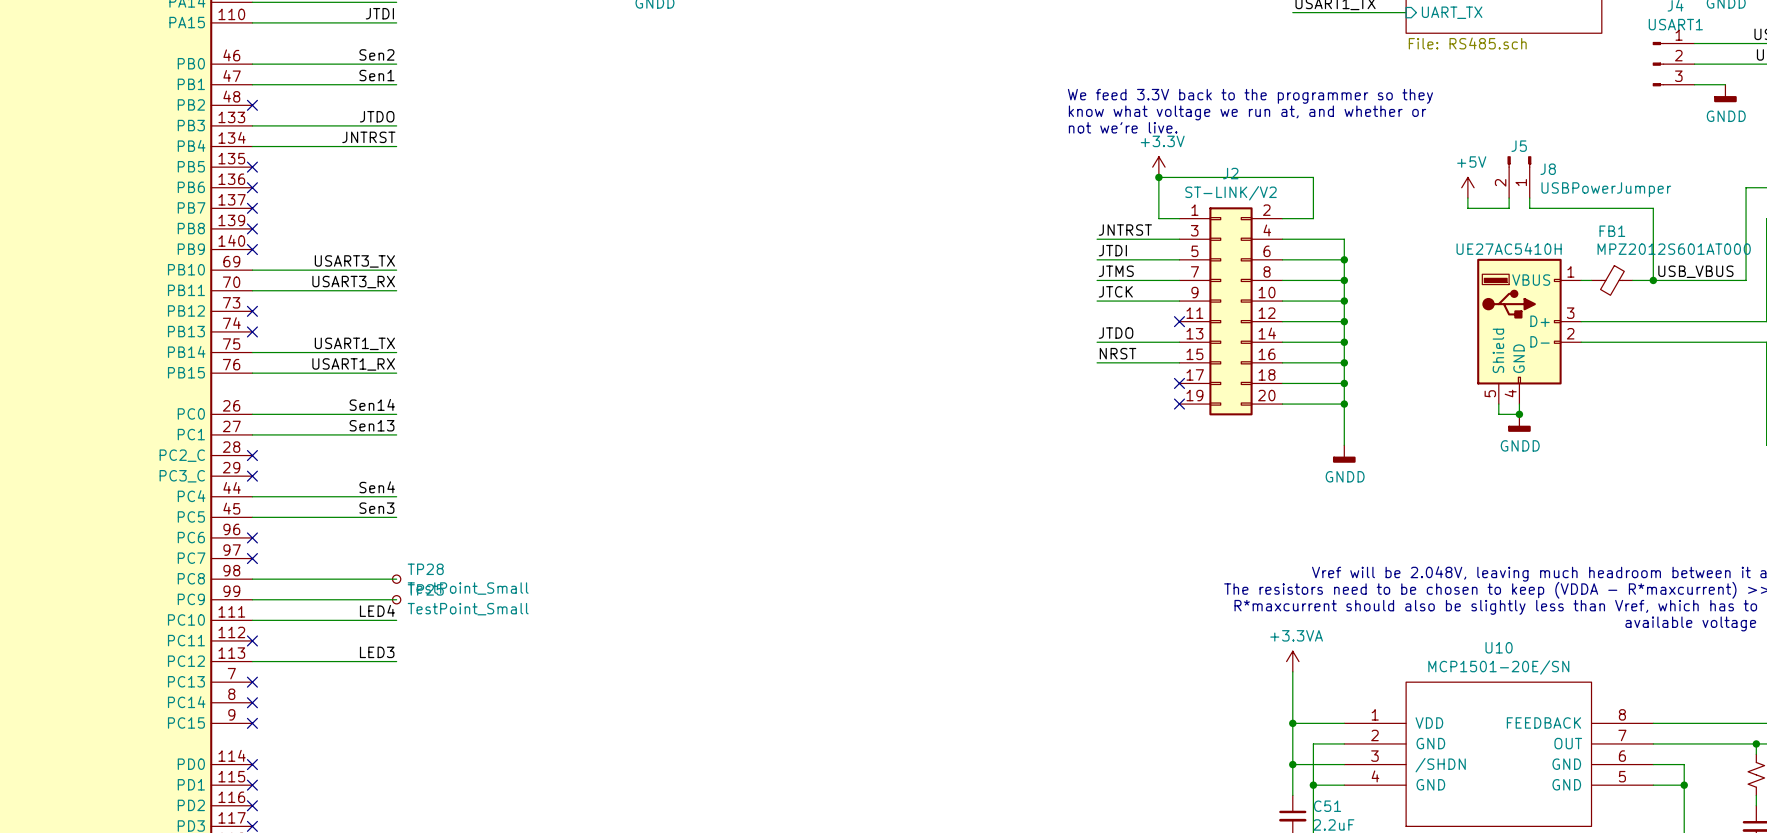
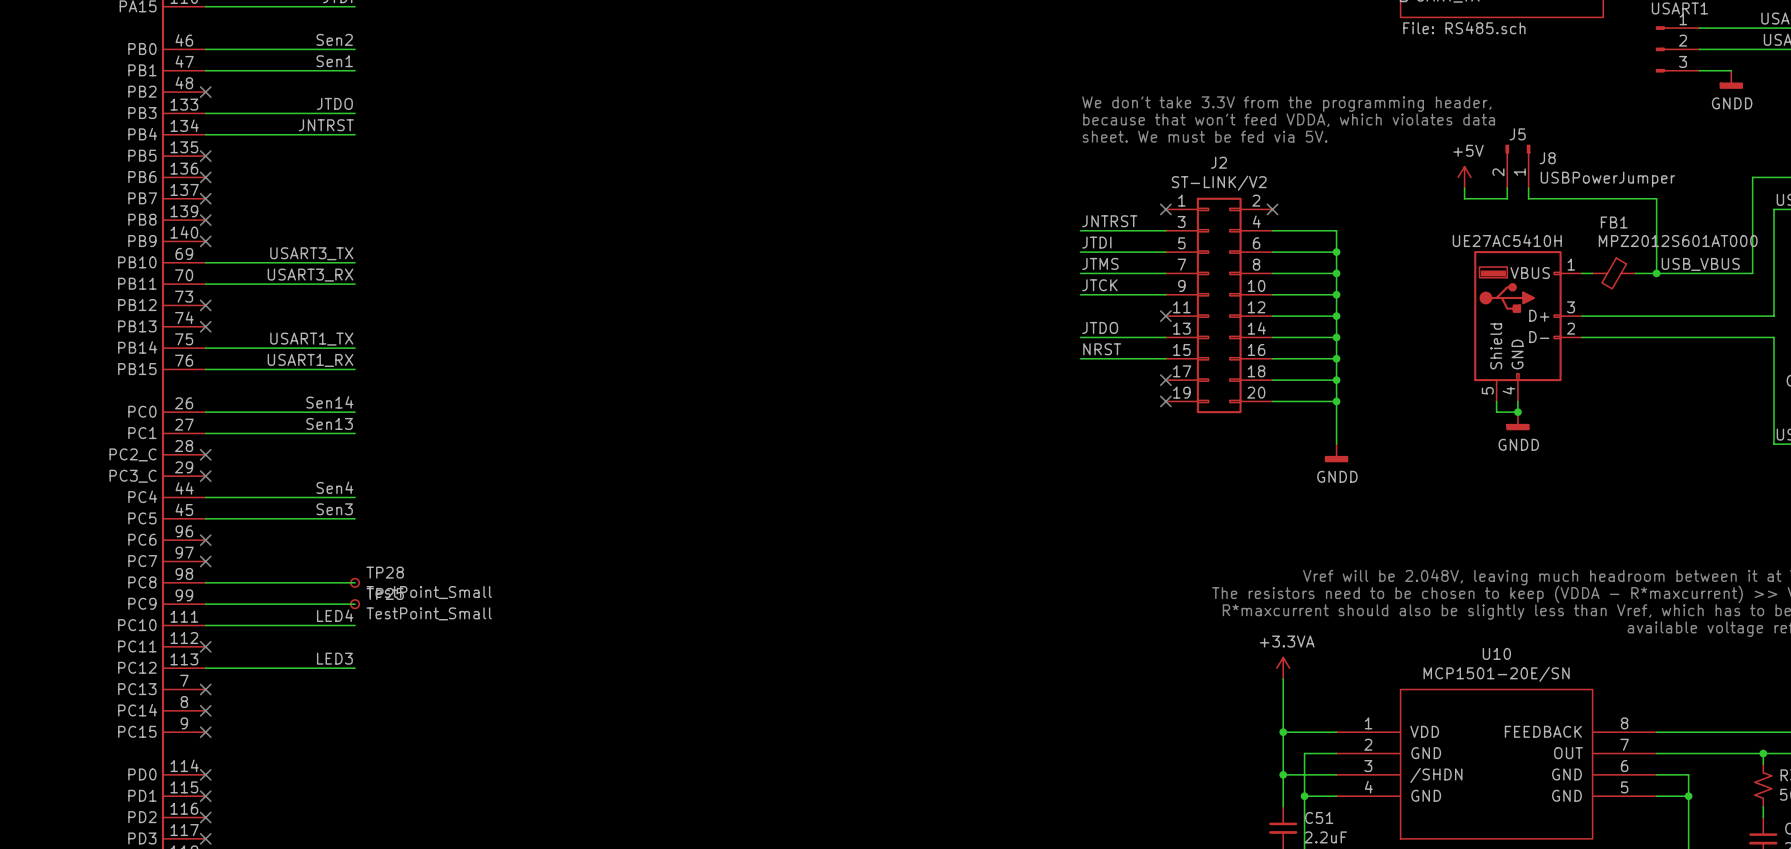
text: We feed 3.3V back to the programmer so they (1250, 96) -> none
text: know what voltage we run at, and whether or (1247, 112) -> none
text: none -> We don't take 3.3V from the programming header, (1286, 104)
text: not we're live. (1123, 127) -> none
text: none -> because that won't feed VDDA, which violates data (1289, 120)
text: none -> sheet. We must be fed via 5V. (1205, 136)
power symbol: +3.3V (1158, 167) -> none
junction: (1158, 177) -> none
wire: (1179, 218) (1158, 218) (1158, 177) (1313, 177) (1313, 218) (1282, 218) -> none
no-connect mark: none -> (1165, 209)
no-connect mark: none -> (1272, 209)

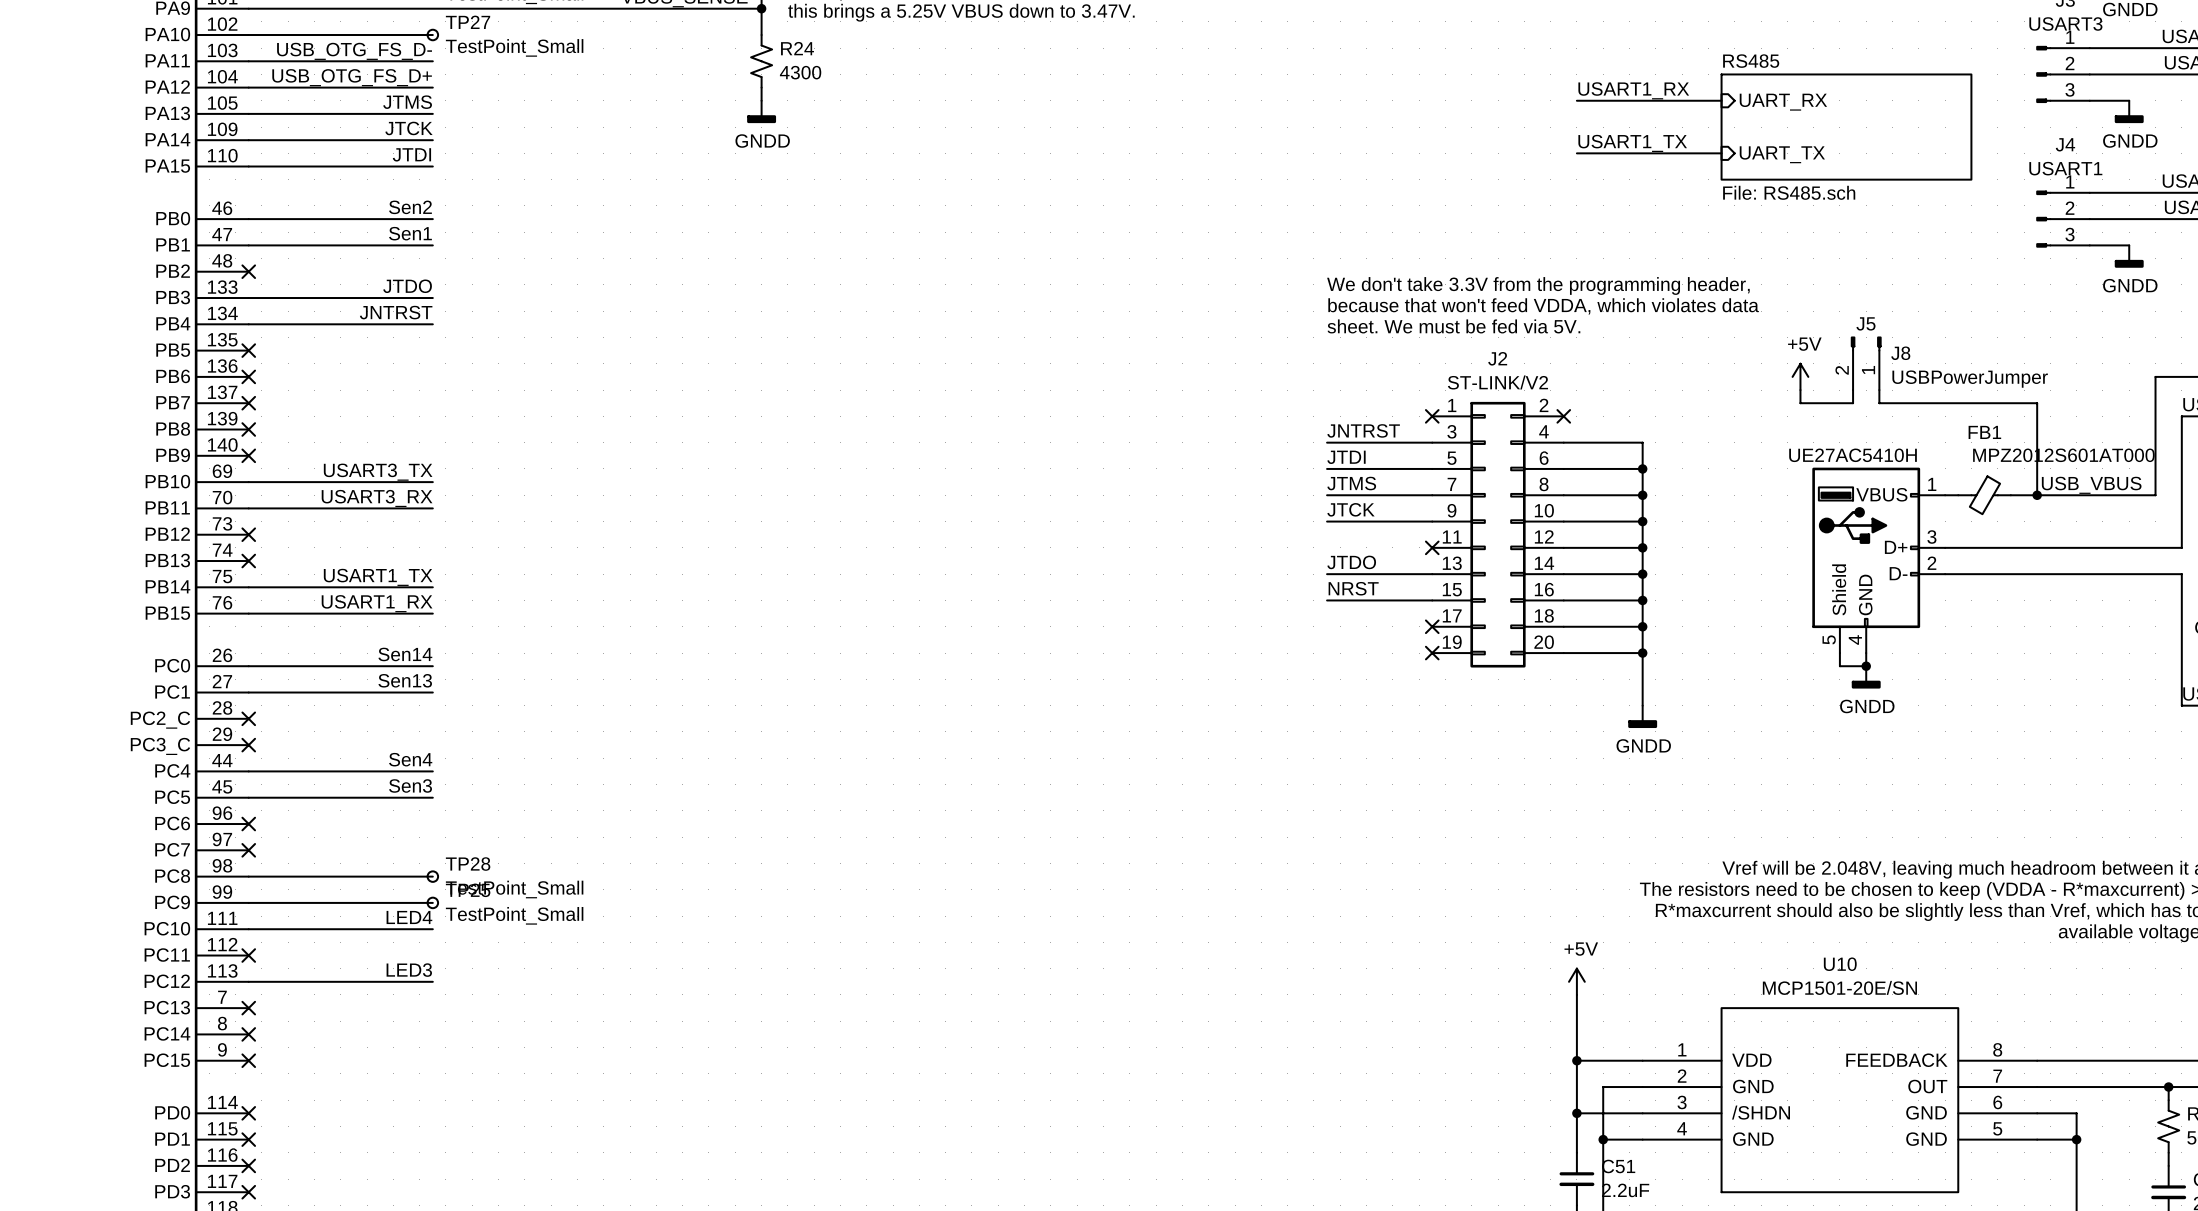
power symbol: +3.3VA (1283, 668) -> +5V (1576, 981)

